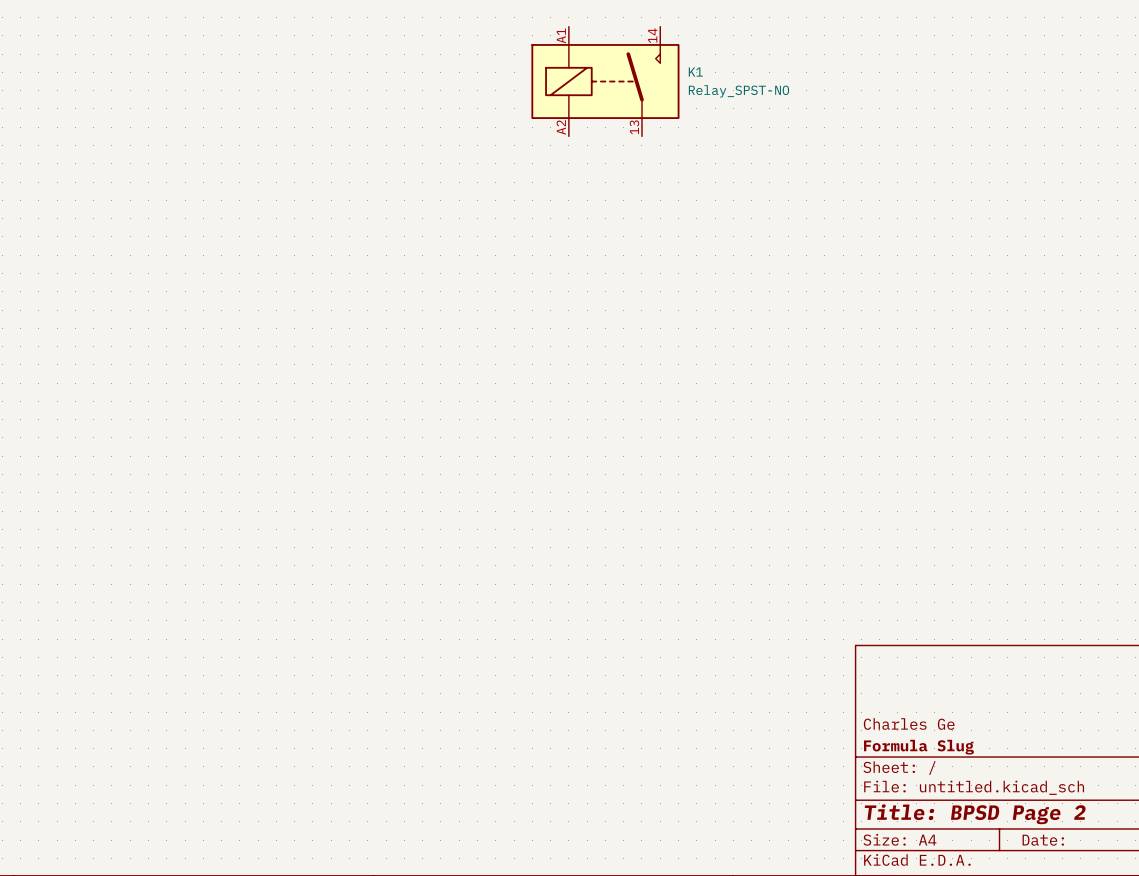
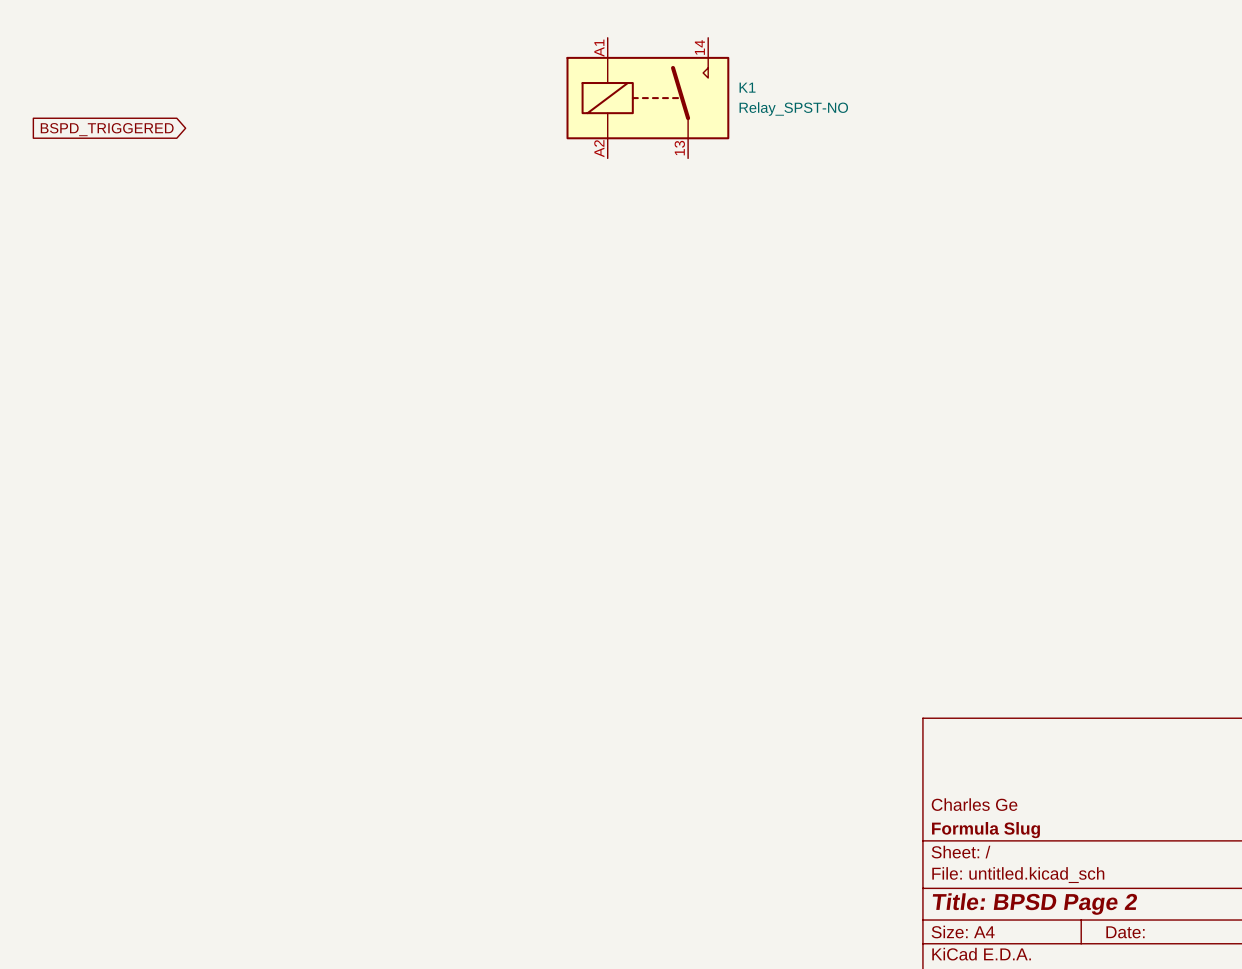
global label: none -> BSPD_TRIGGERED (107, 129)

